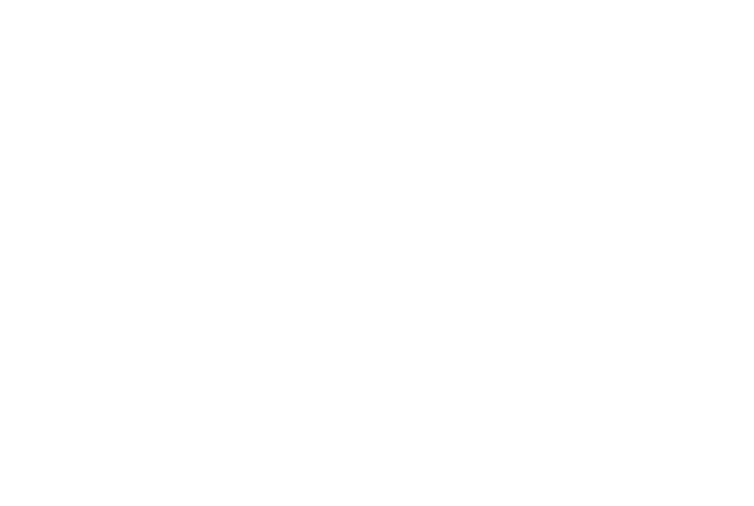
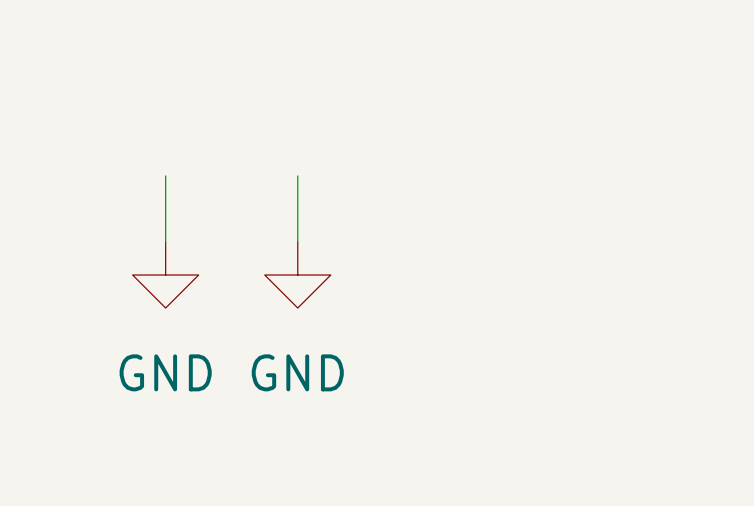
wire: none -> (165, 175) (165, 241)
wire: none -> (297, 175) (297, 241)
power symbol: none -> GND (165, 275)
power symbol: none -> GND (297, 275)

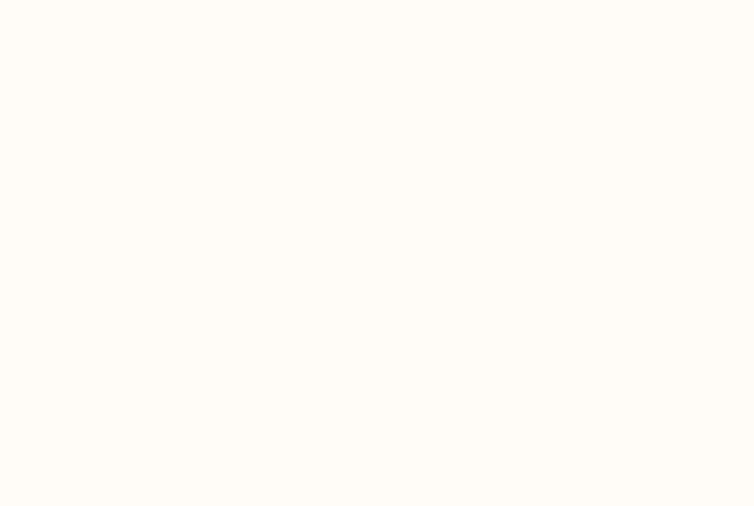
wire: (165, 175) (165, 241) -> none
wire: (297, 175) (297, 241) -> none
power symbol: GND (165, 275) -> none
power symbol: GND (297, 275) -> none

